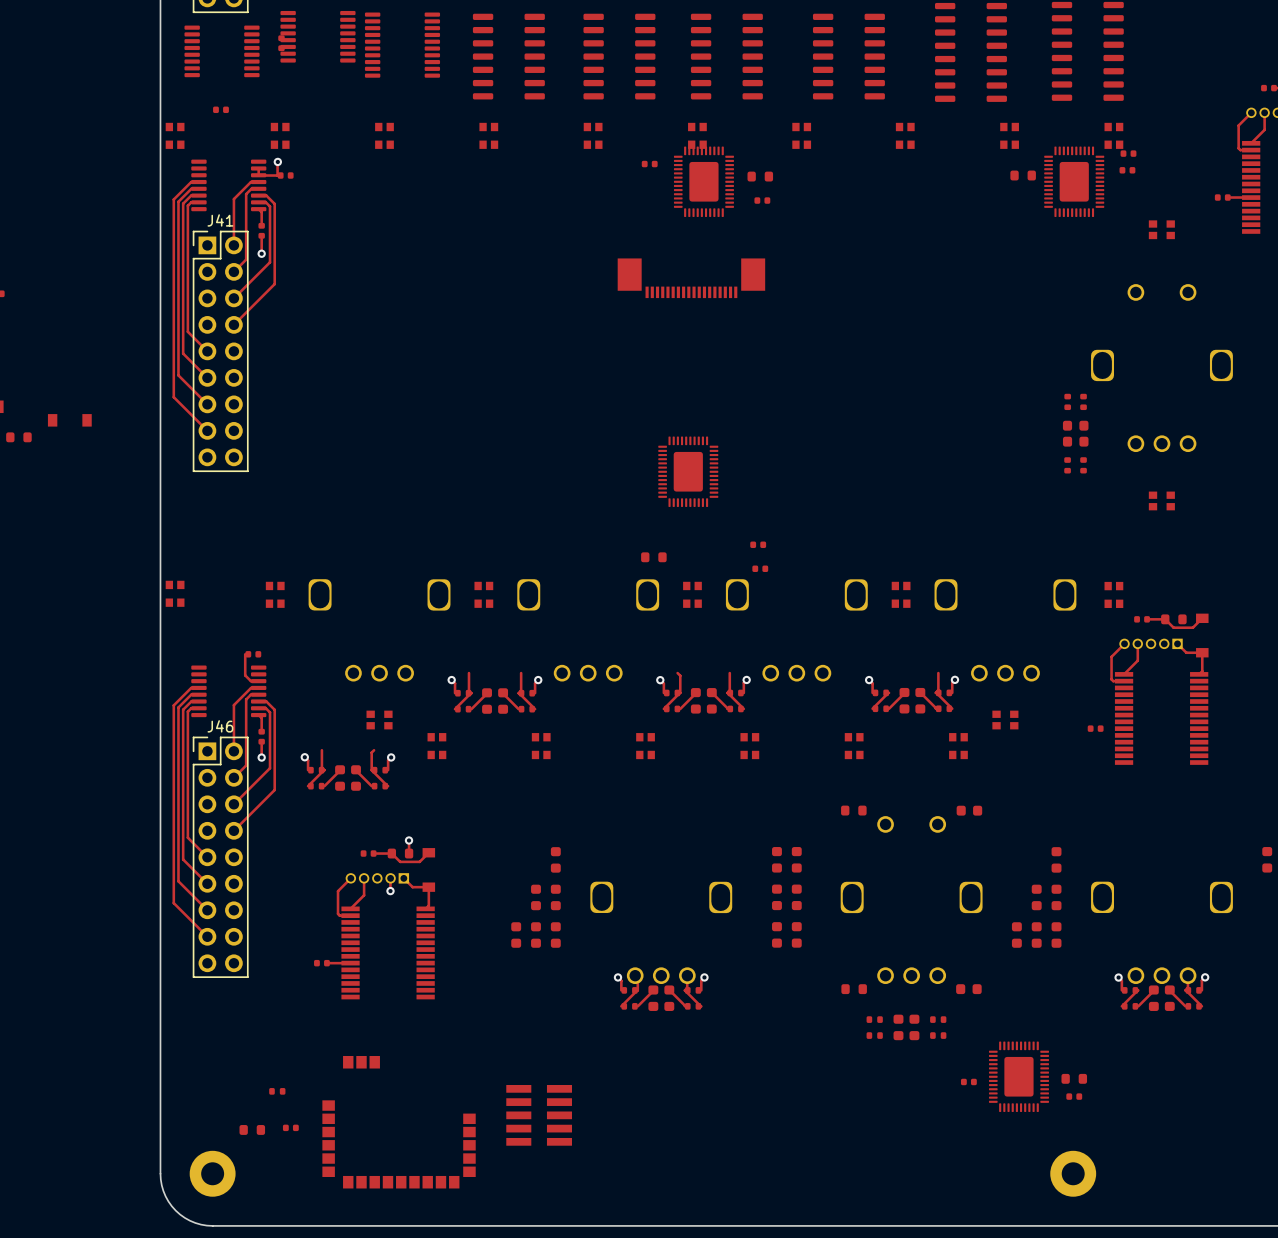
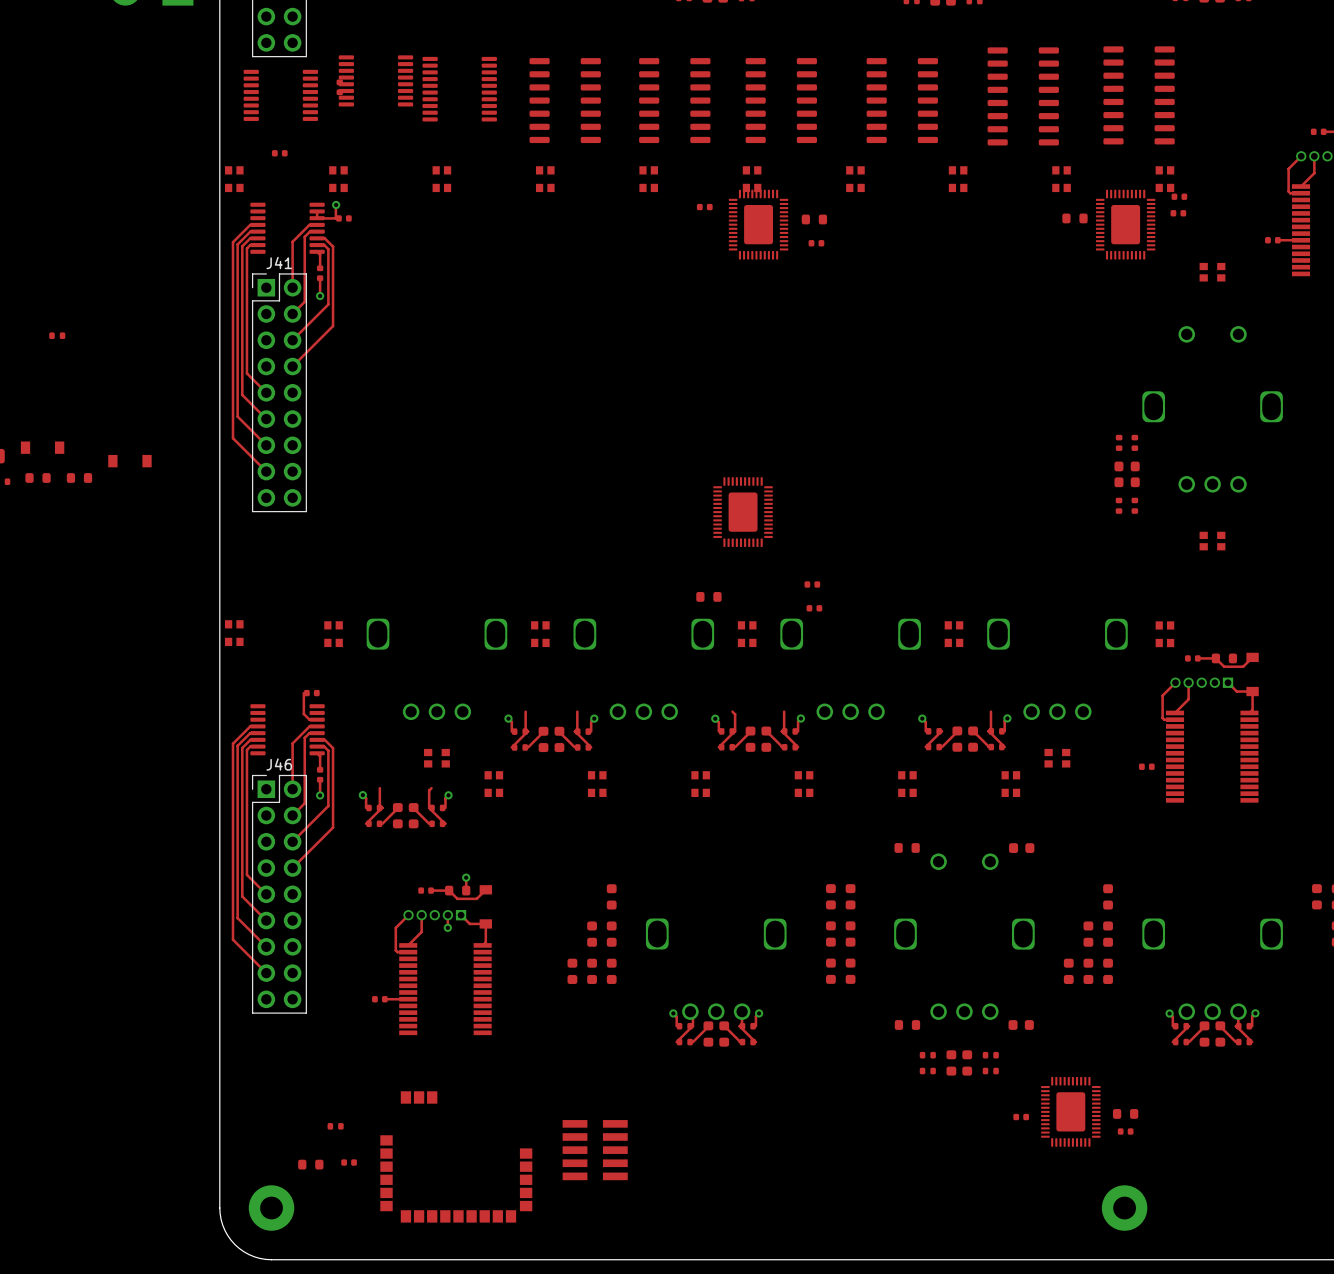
part: (691, 278) -> none

